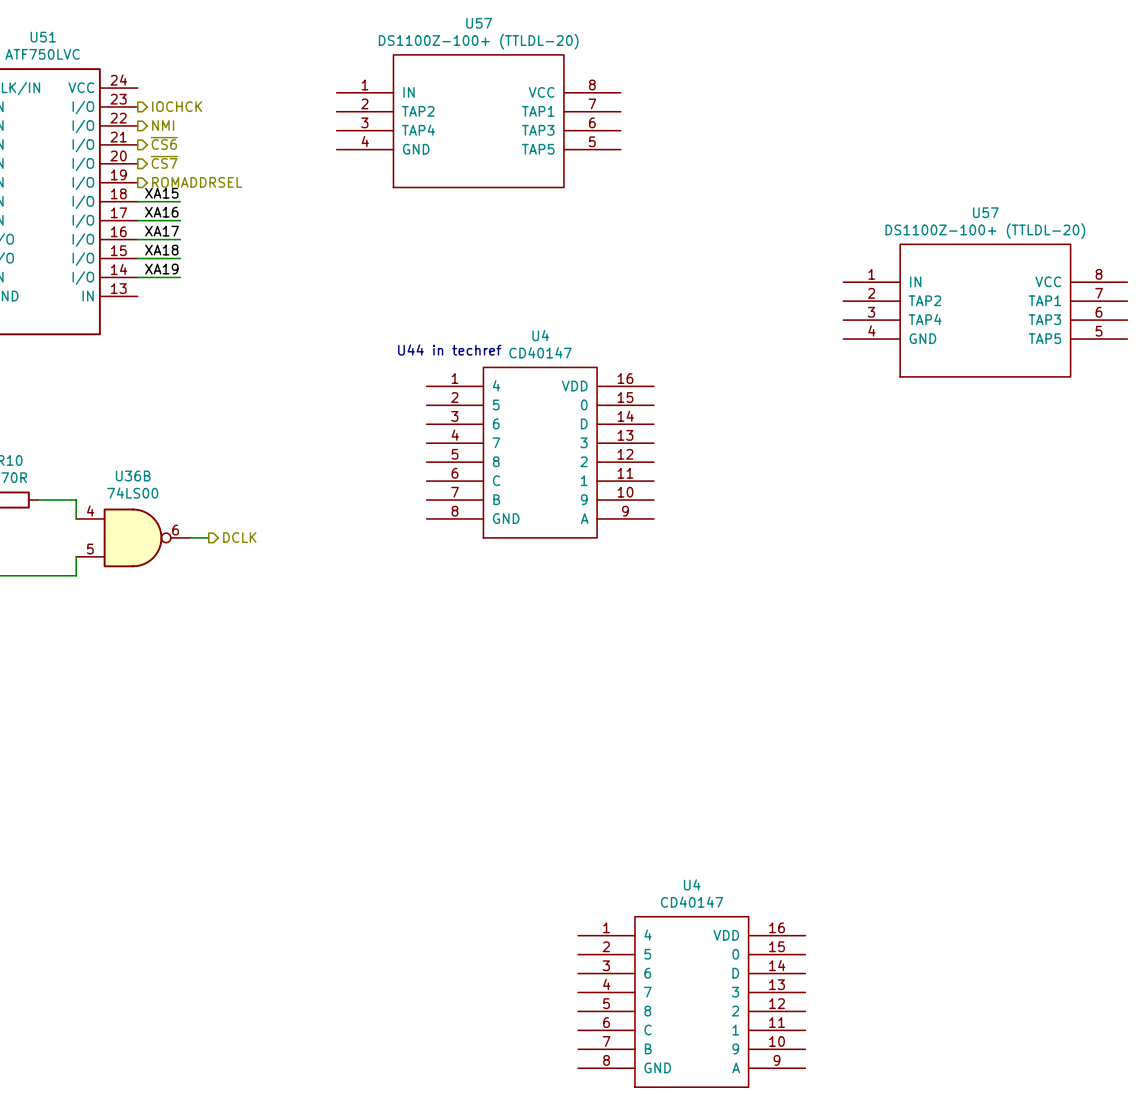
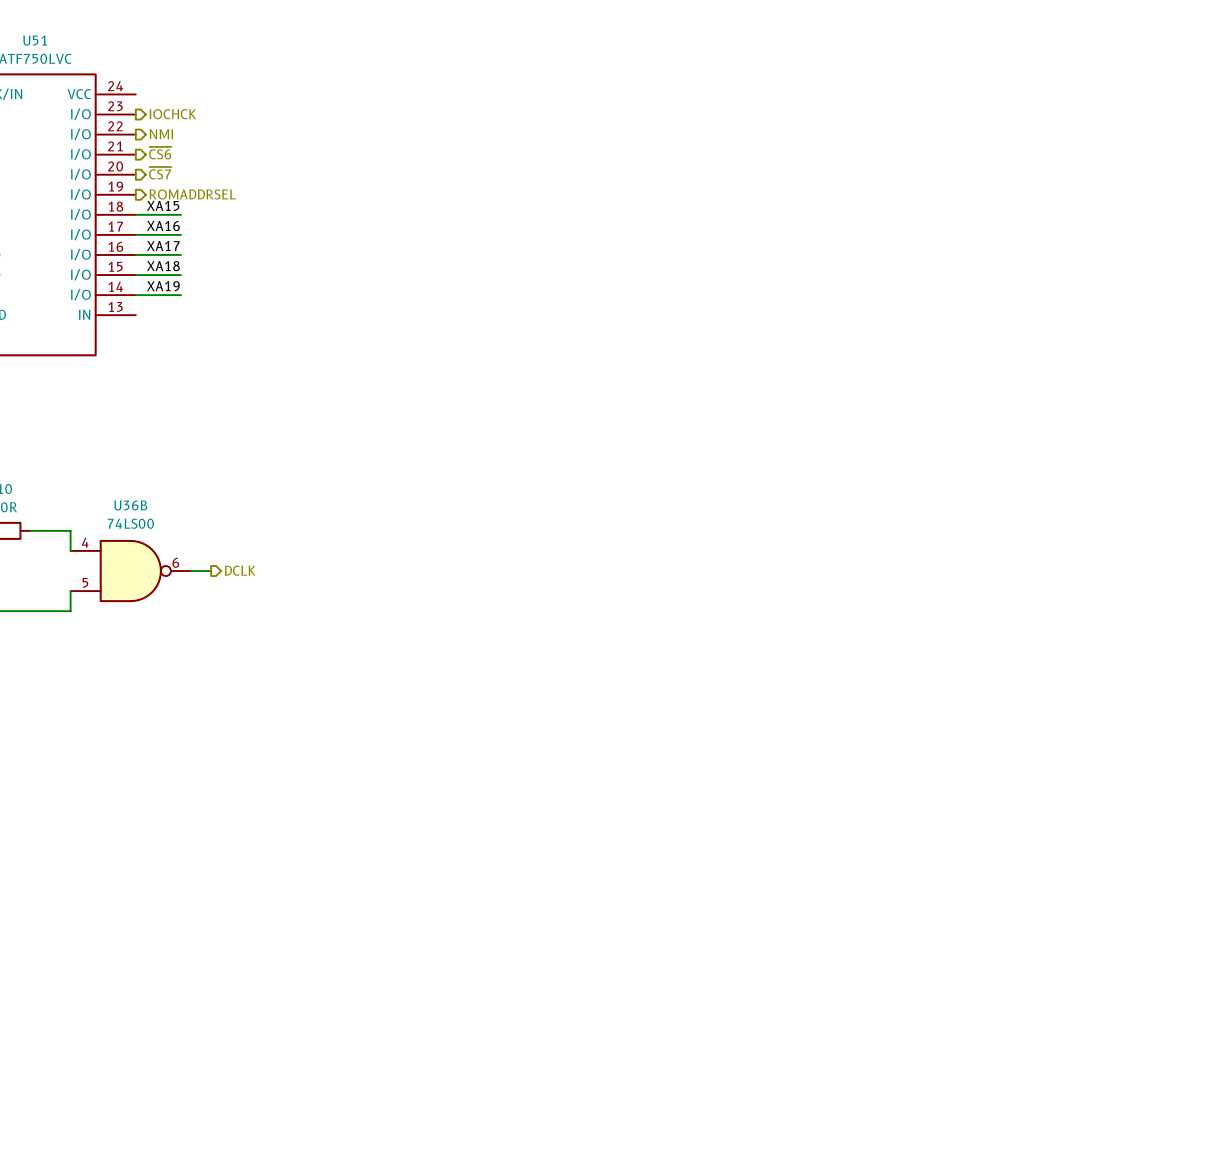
U57: DS1100Z-100+ (TTLDL-20) (478, 121) -> none
U57: DS1100Z-100+ (TTLDL-20) (985, 310) -> none
text: U44 in techref (449, 349) -> none
U4: CD40147 (540, 452) -> none
U4: CD40147 (691, 1001) -> none

